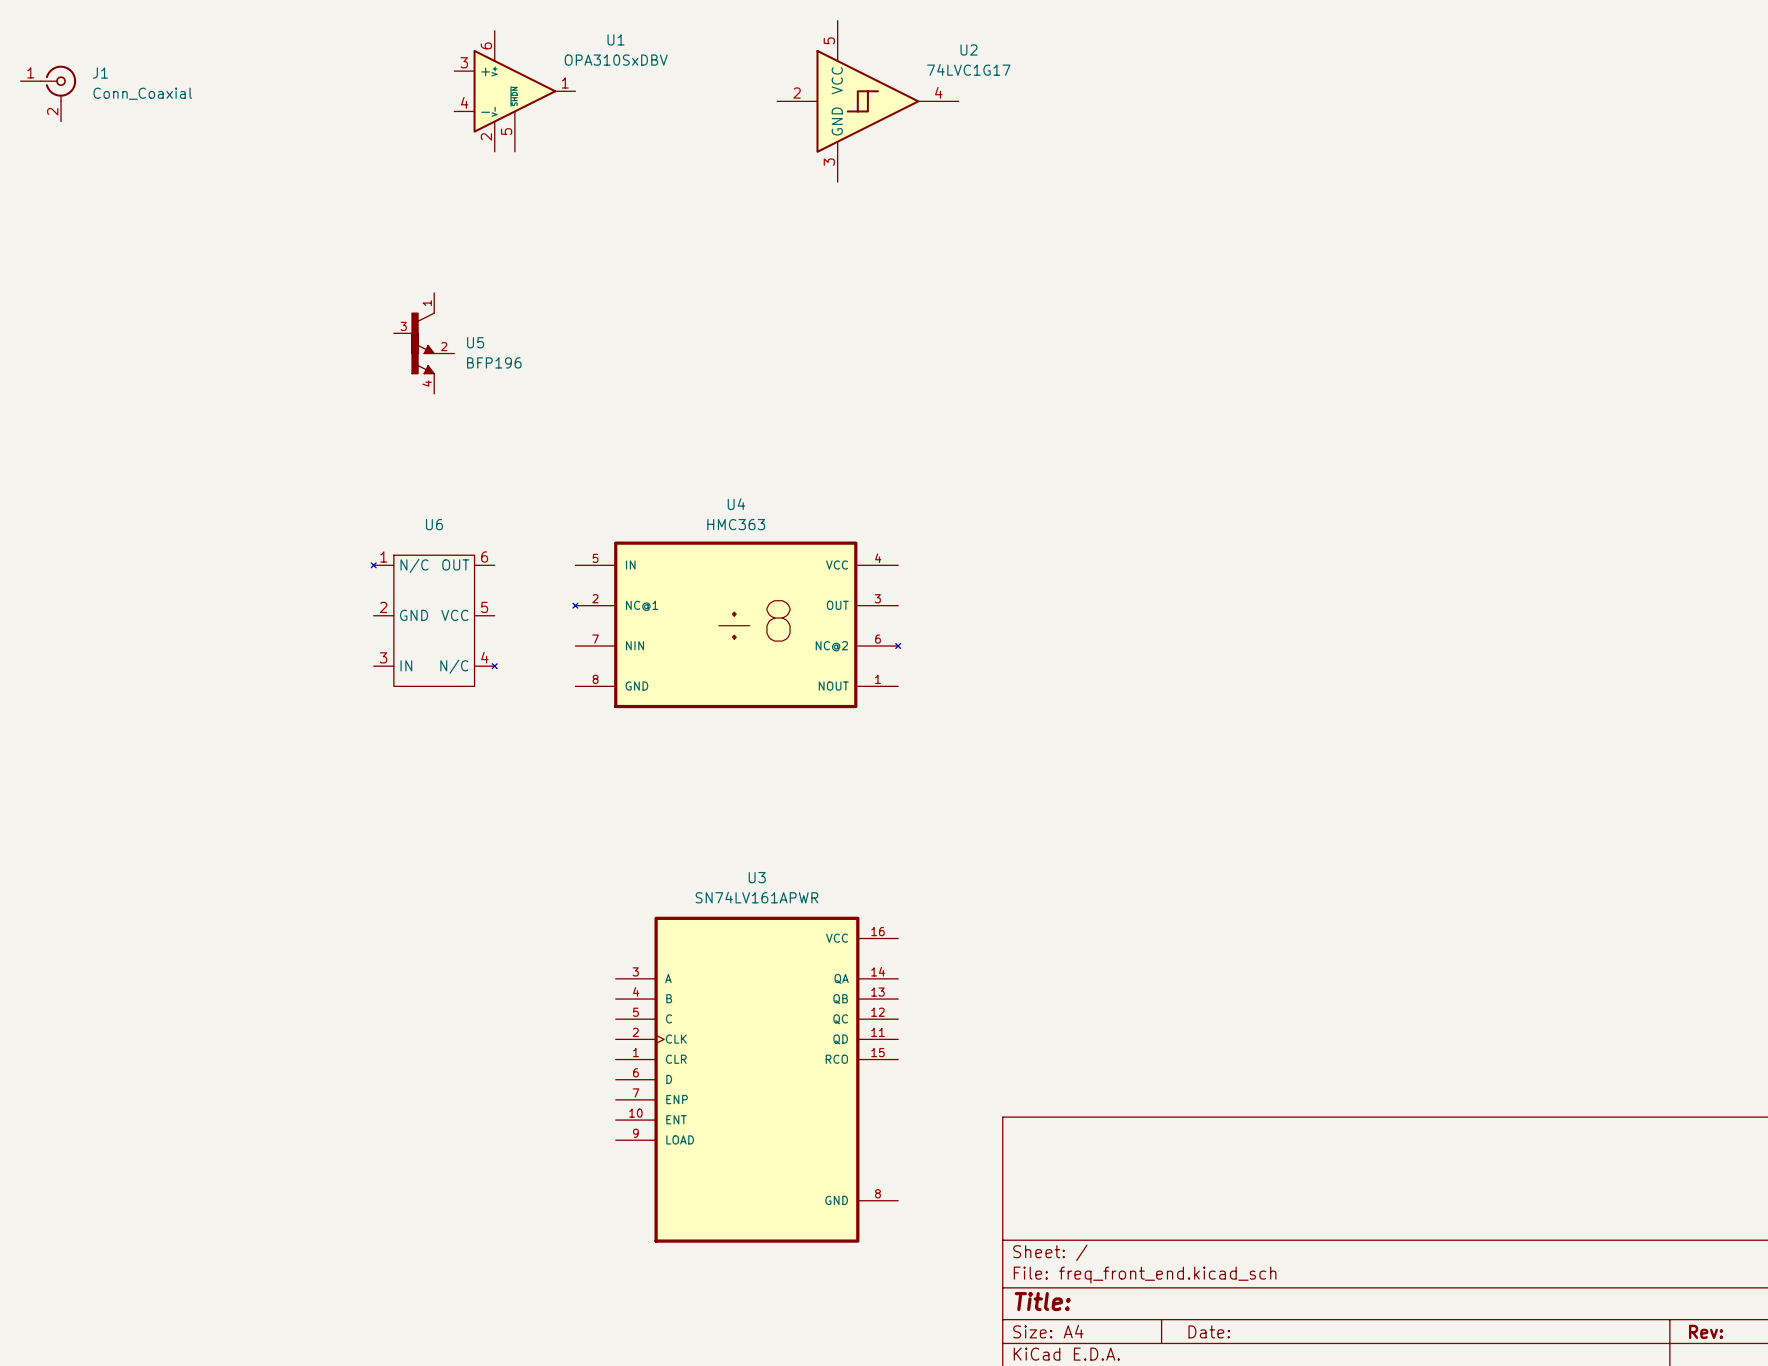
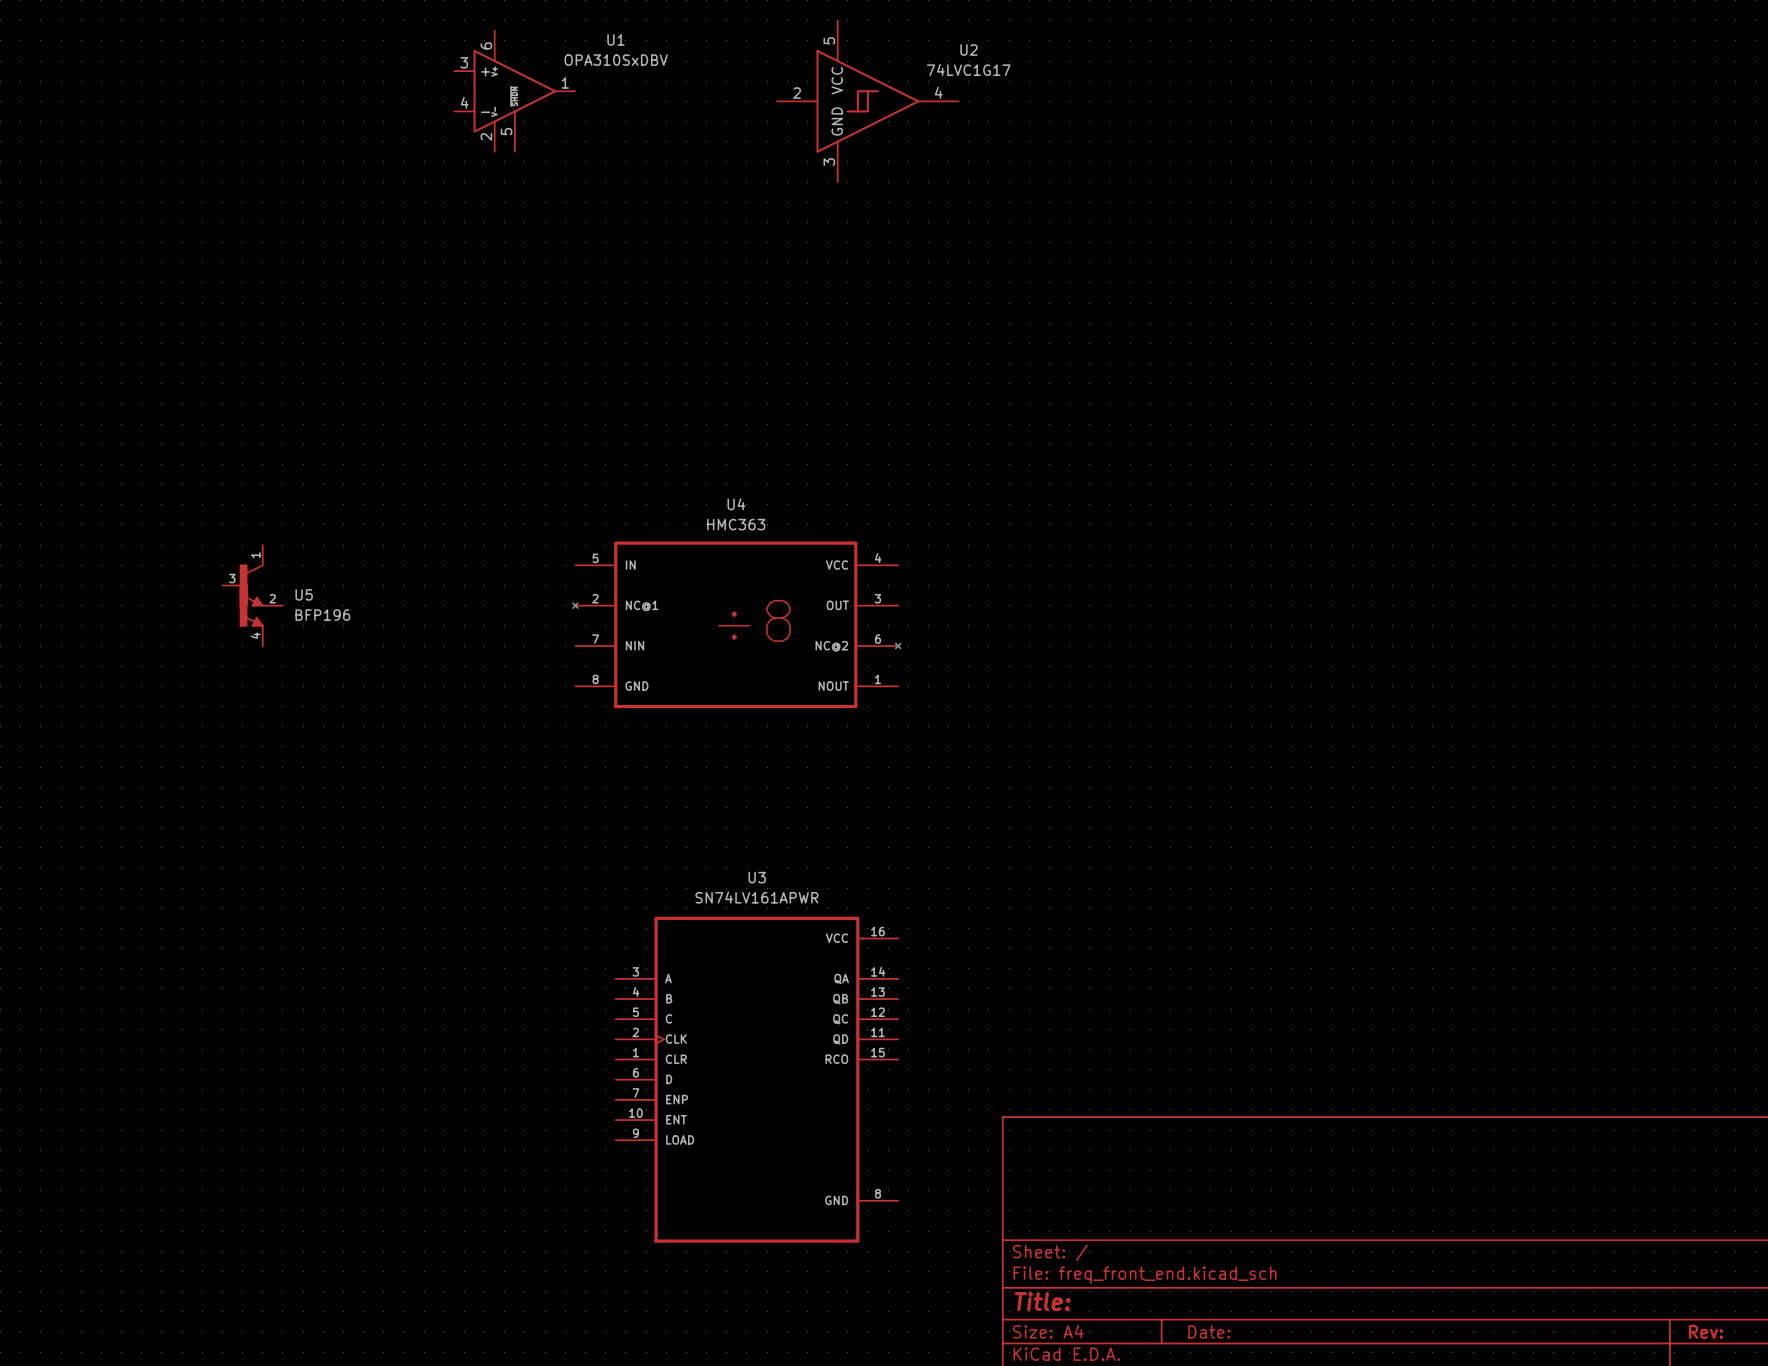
J1: Conn_Coaxial (48, 93) -> none
U5 position: (424, 343) -> (252, 595)
U6: (434, 620) -> none

